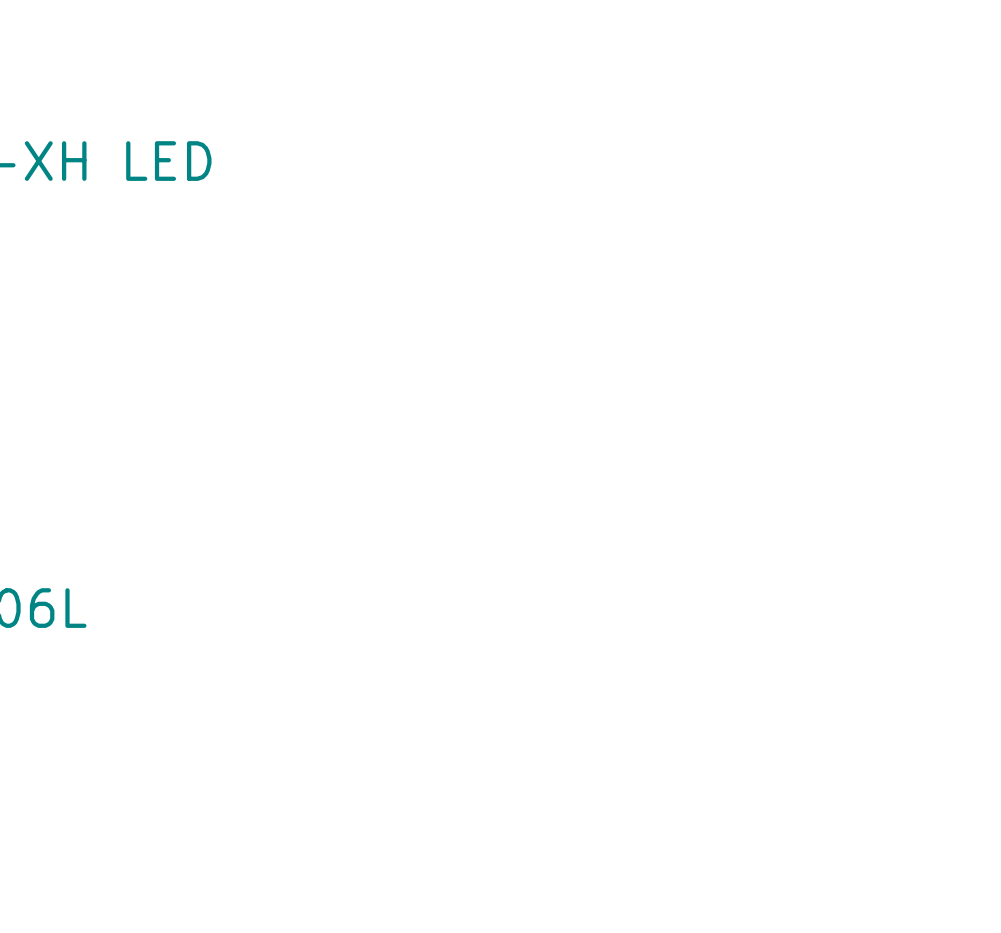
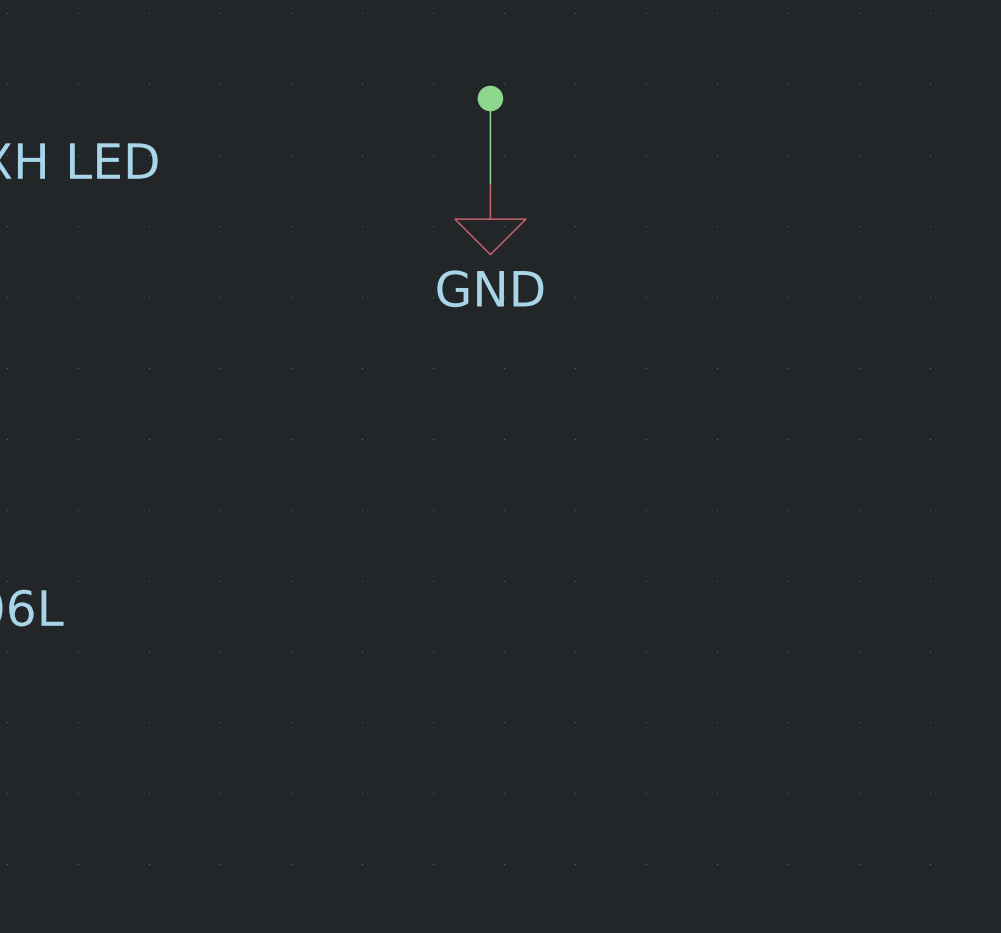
wire: none -> (490, 98) (490, 183)
junction: none -> (490, 98)
power symbol: none -> GND (490, 219)

